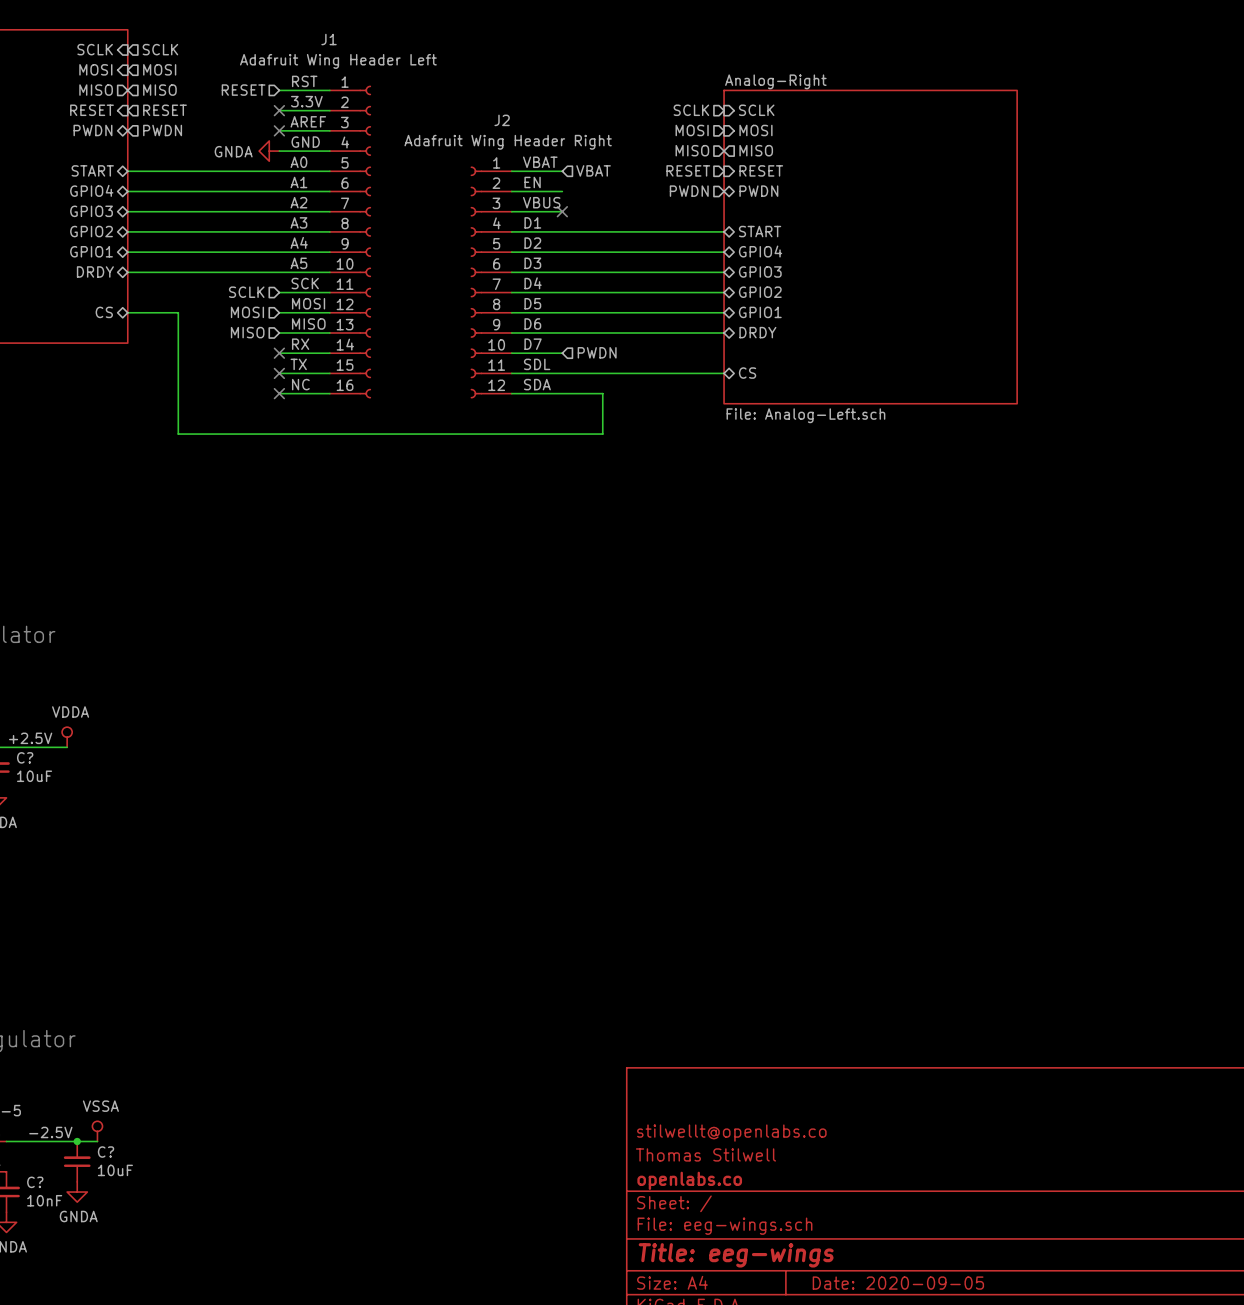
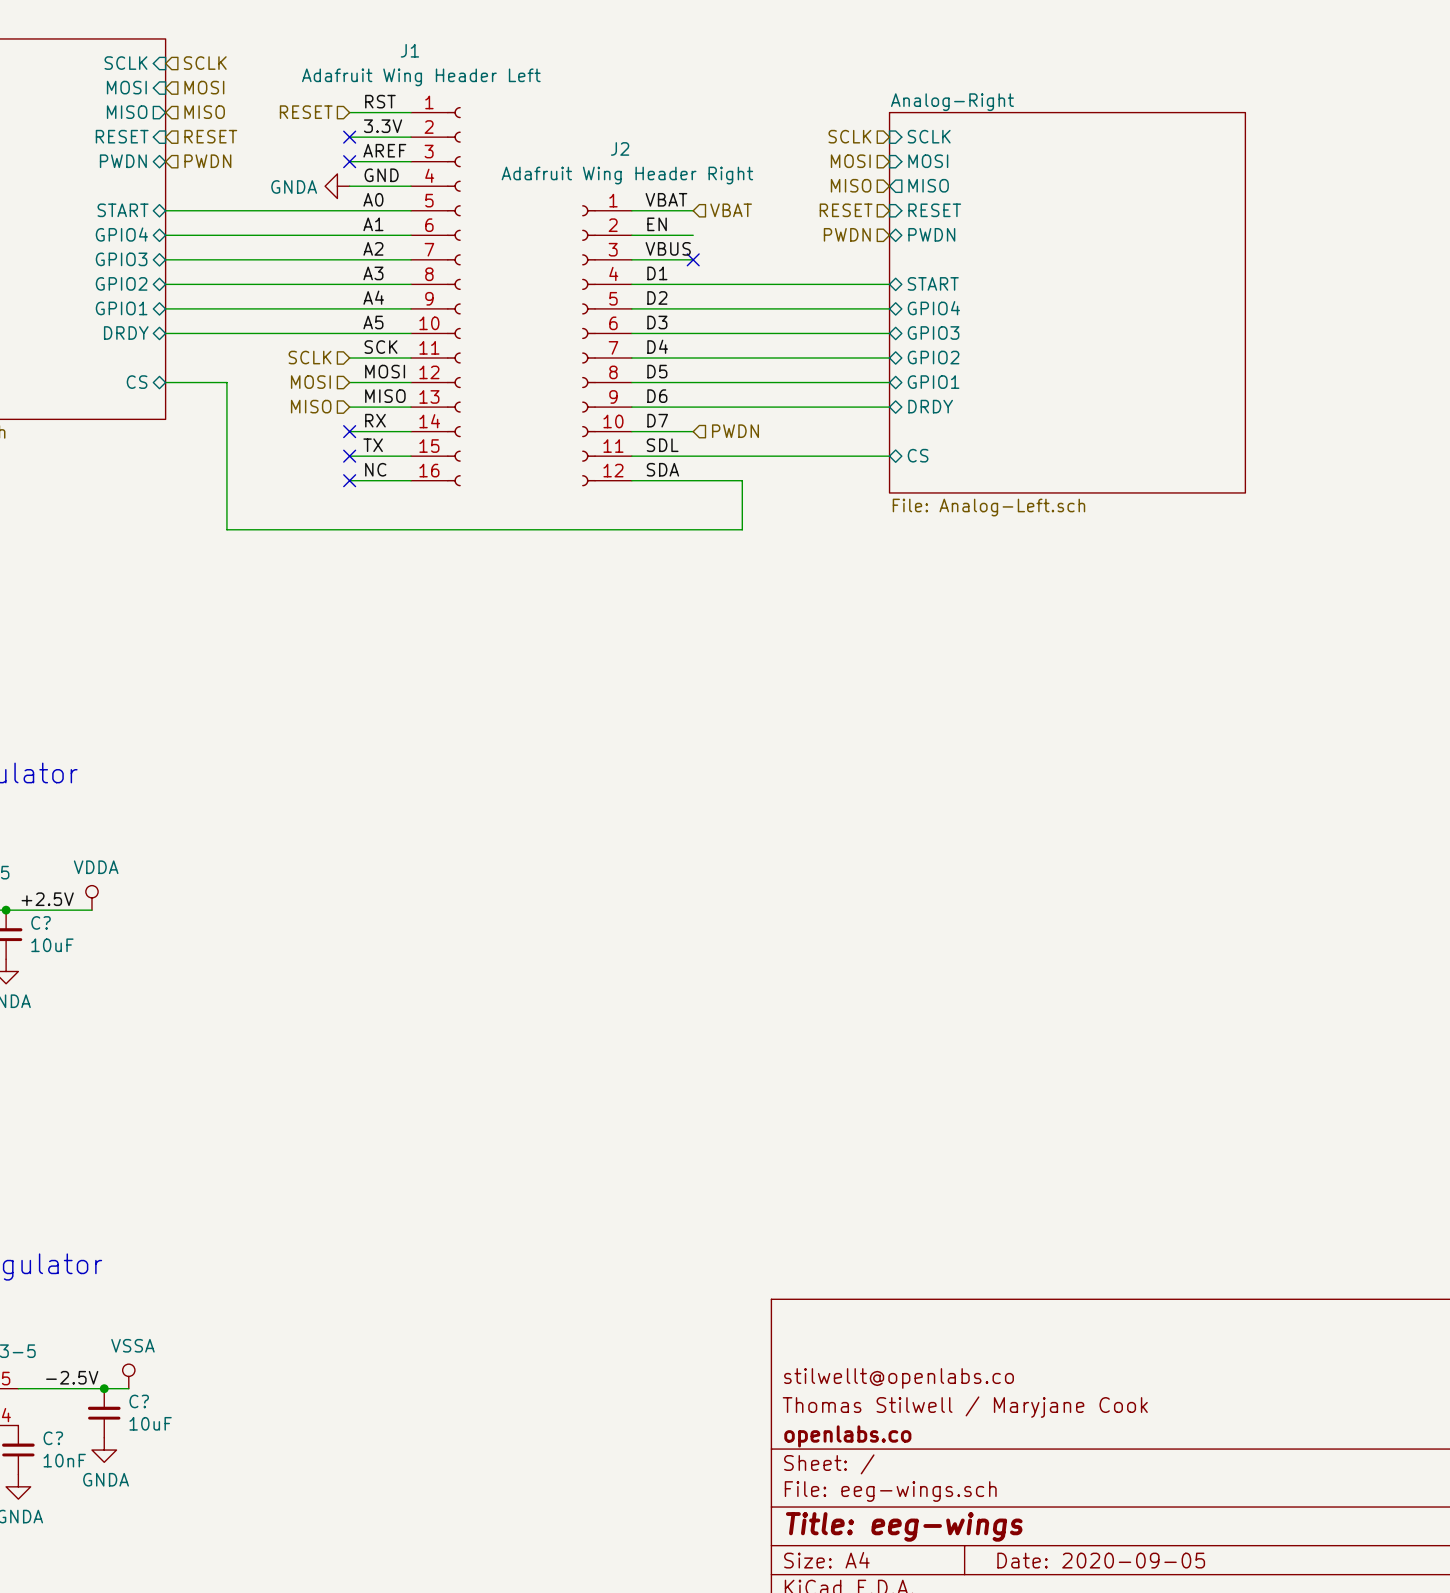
title block: Thomas Stilwell (705, 1154) -> Thomas Stilwell / Maryjane Cook (965, 1407)

